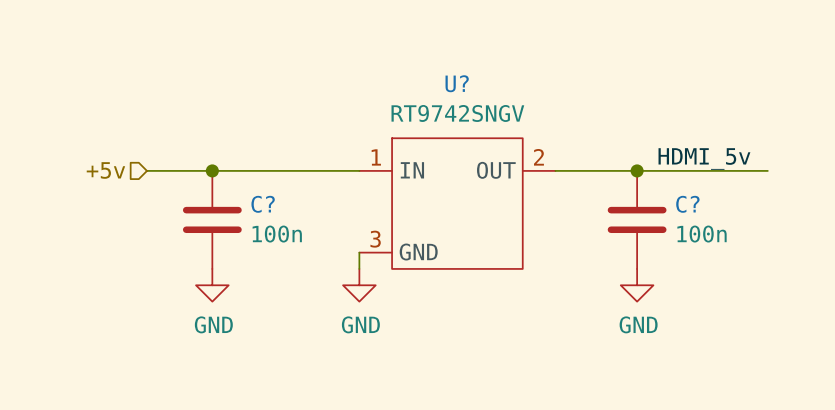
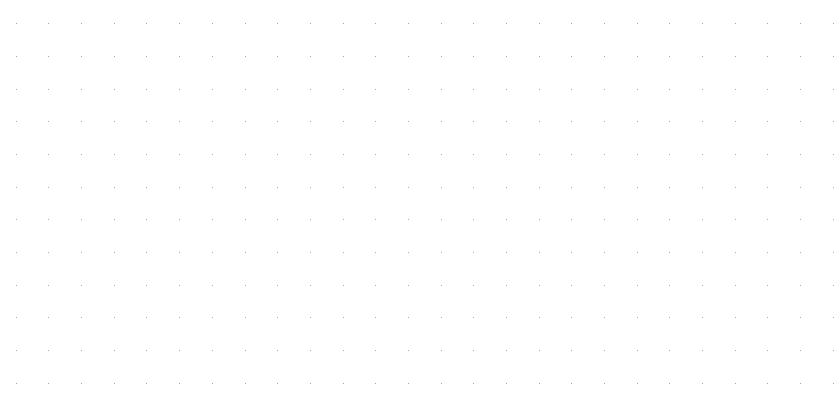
label: HDMI_5v (704, 158) -> none
hierarchical label: +5v (105, 170) -> none
wire: (146, 170) (359, 170) -> none
junction: (212, 170) -> none
wire: (555, 170) (767, 170) -> none
junction: (637, 170) -> none
U?: RT9742SNGV (457, 203) -> none
C?: 100n (212, 219) -> none
C?: 100n (637, 219) -> none
wire: (359, 252) (359, 268) -> none
power symbol: GND (212, 285) -> none
power symbol: GND (359, 285) -> none
power symbol: GND (637, 285) -> none

